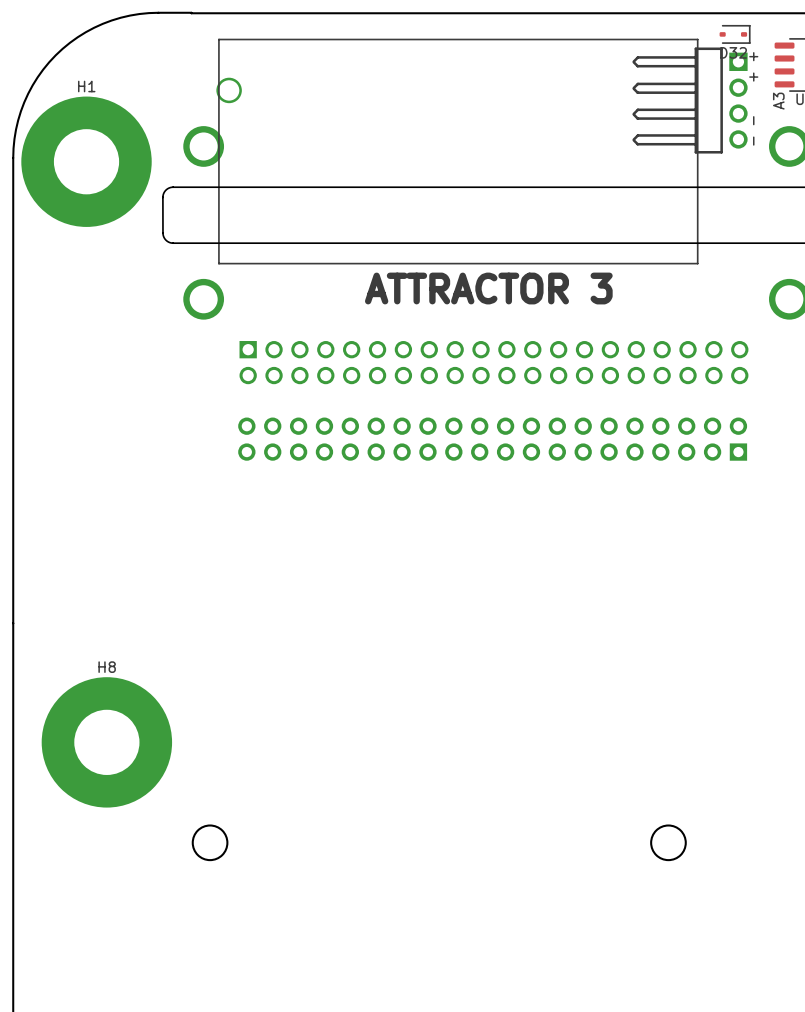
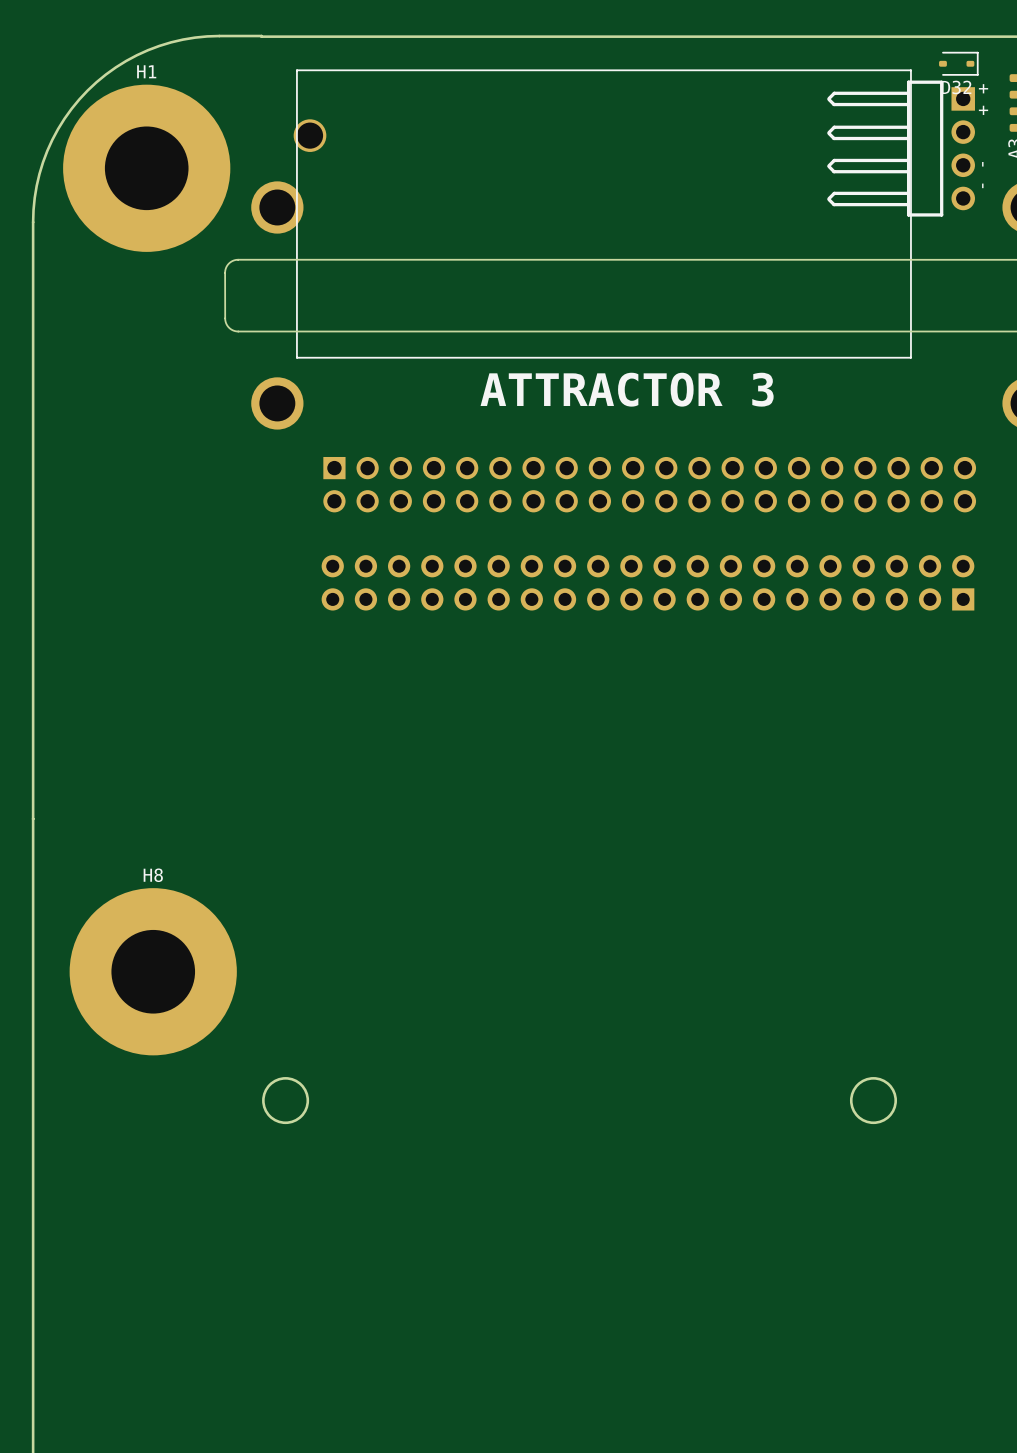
H1 position: (86, 161) -> (146, 168)

